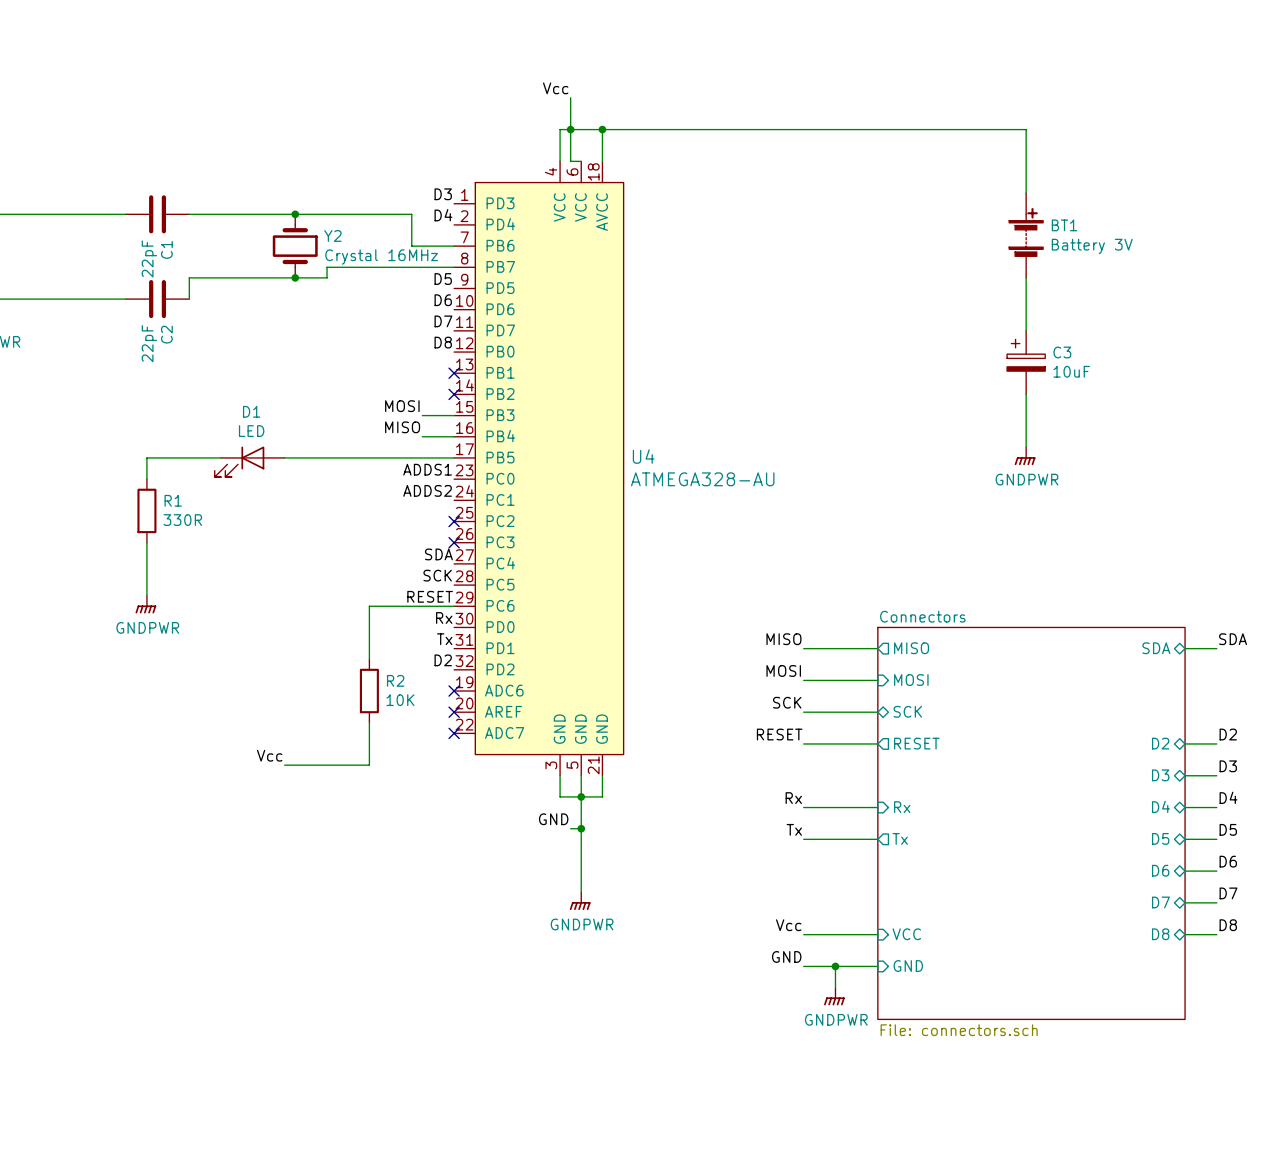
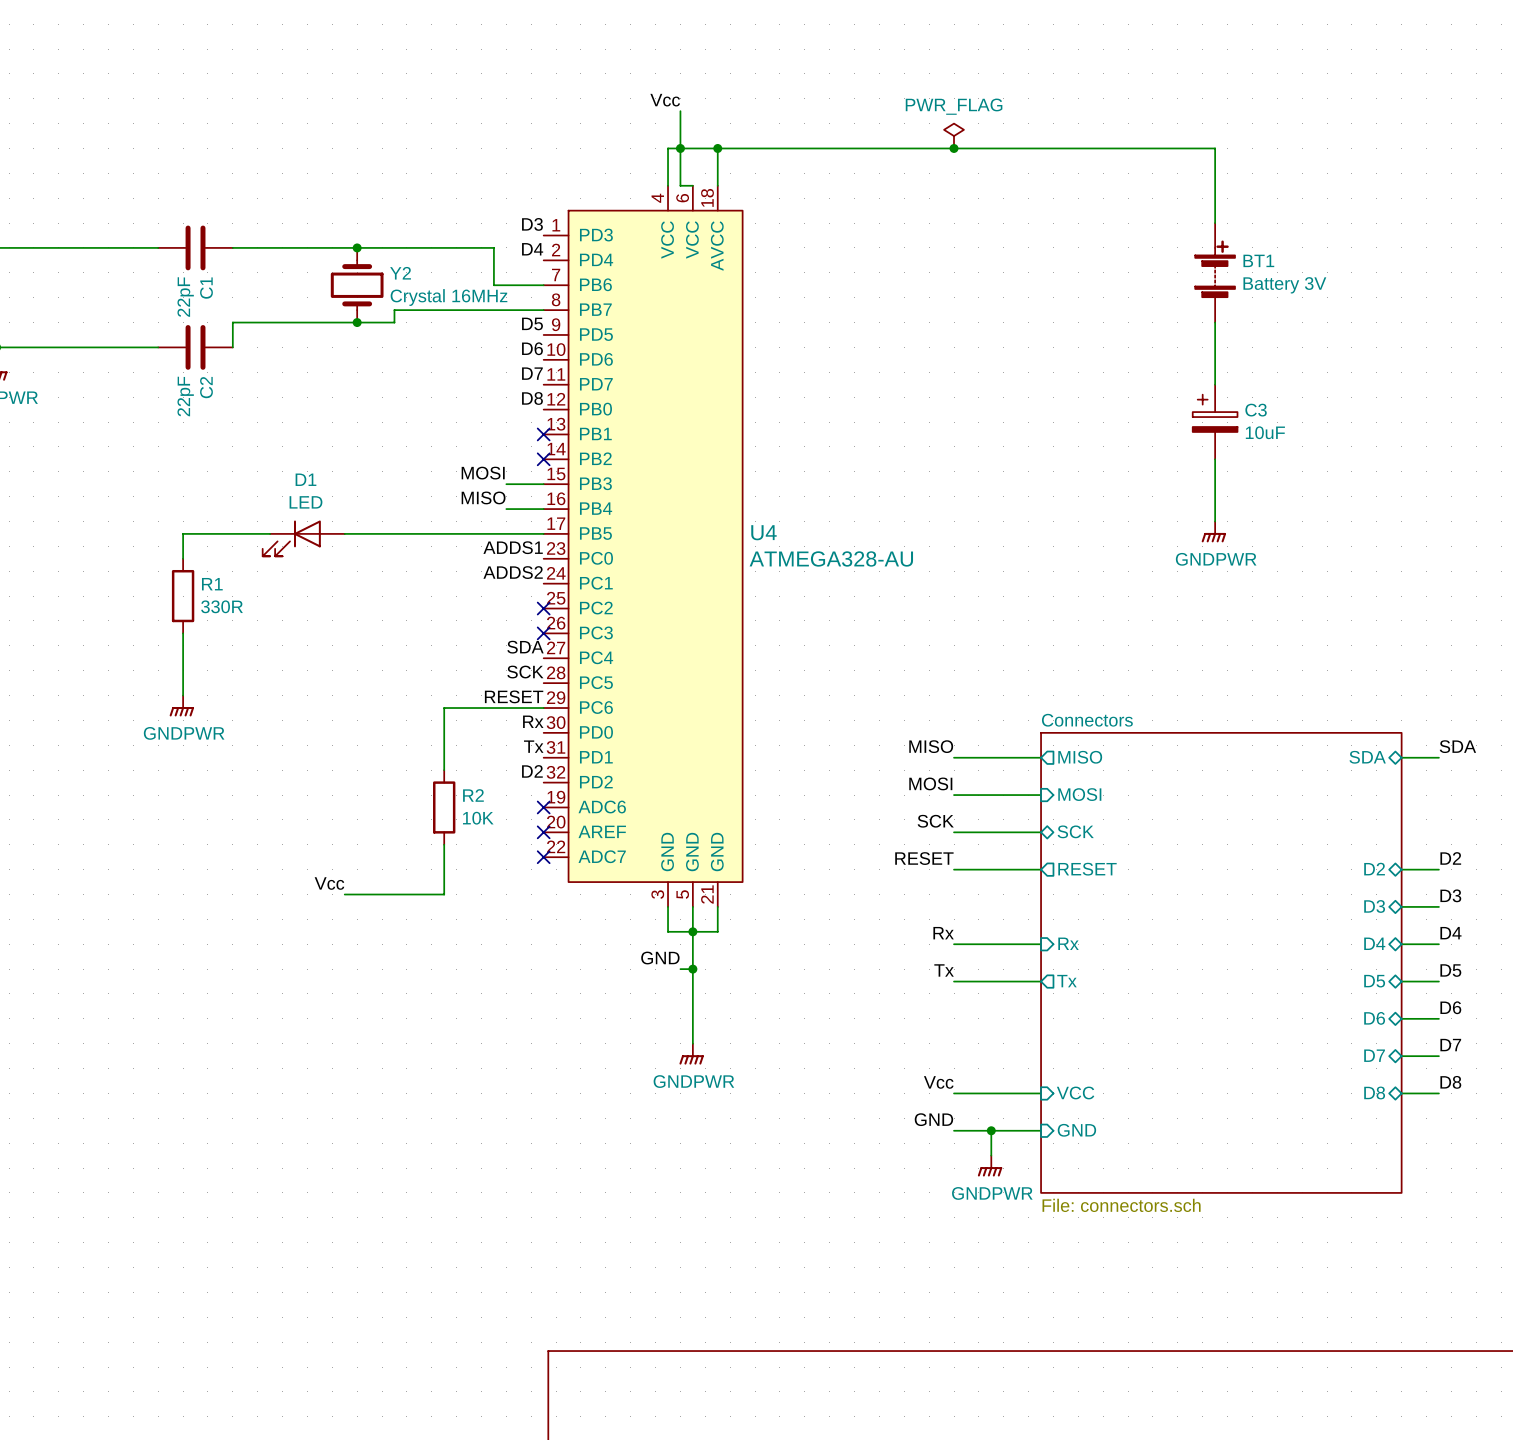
power symbol: none -> PWR_FLAG (954, 136)
junction: none -> (954, 148)

